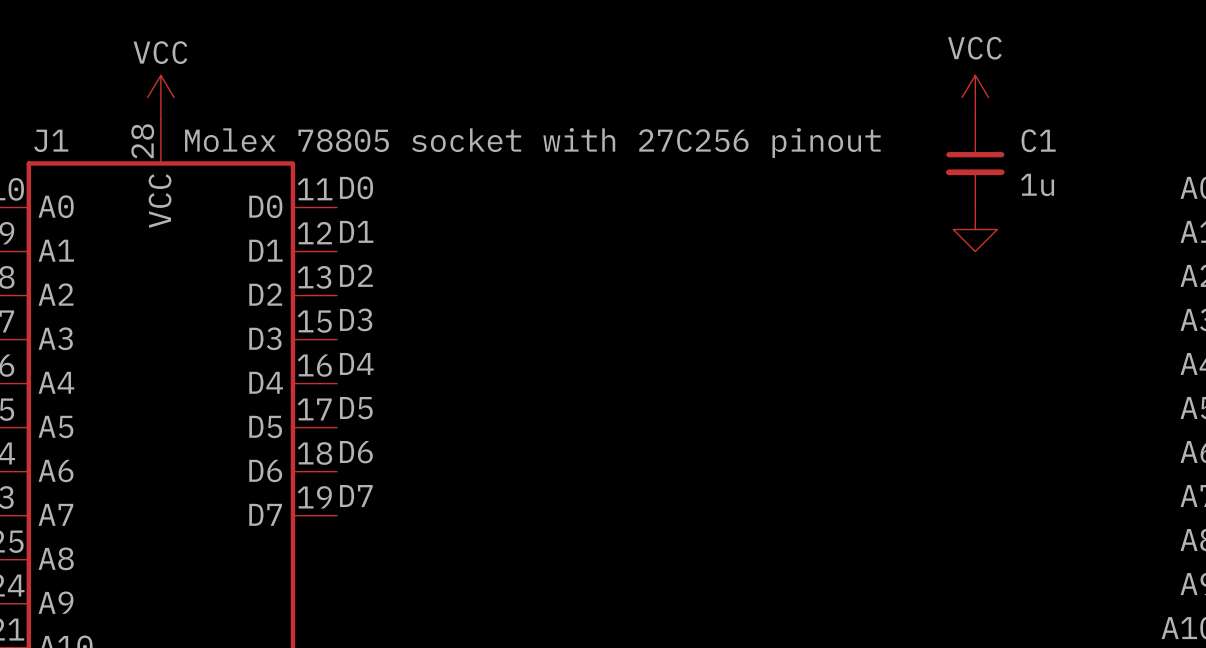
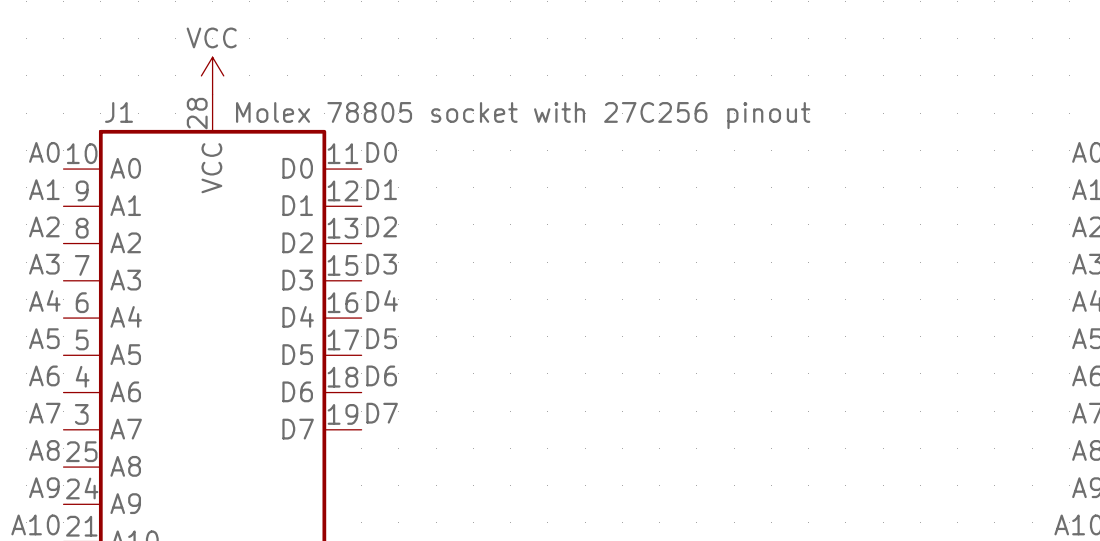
power symbol: VCC (975, 97) -> none
C1: 1u (975, 163) -> none
power symbol: (975, 229) -> none

